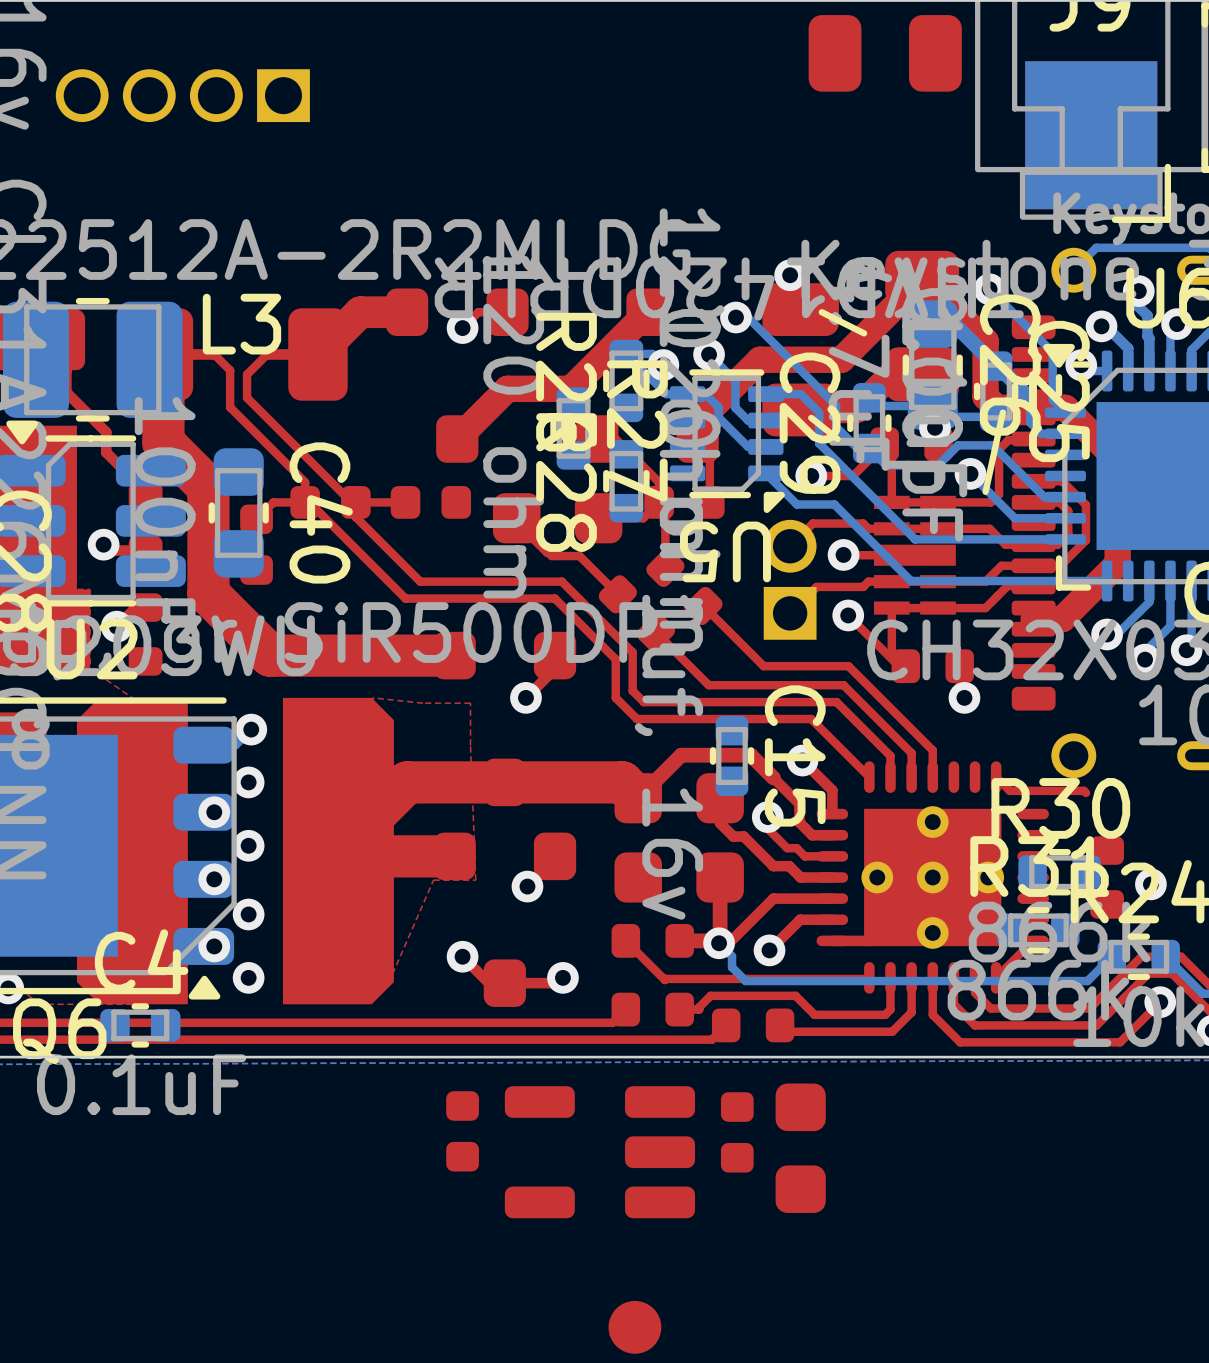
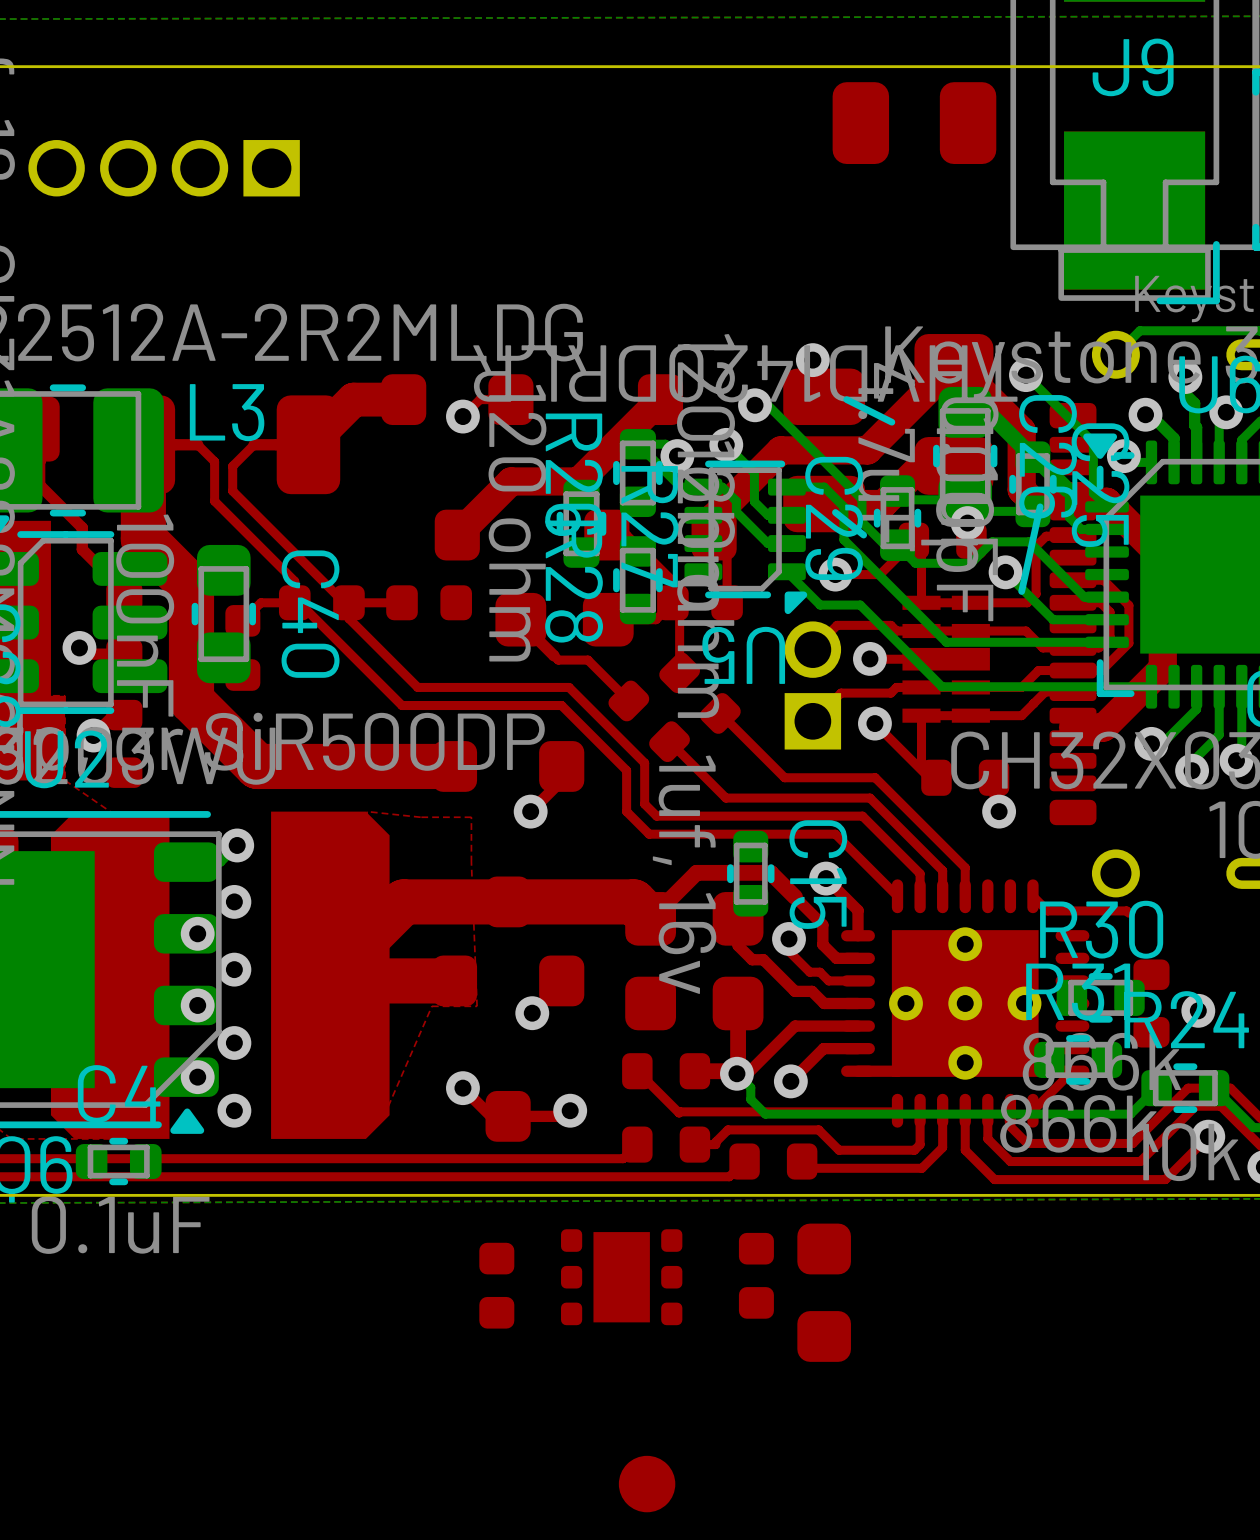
part footprint: [504, 1086, 696, 1219] -> [561, 1229, 683, 1326]
part position: (462, 1131) -> (496, 1285)

